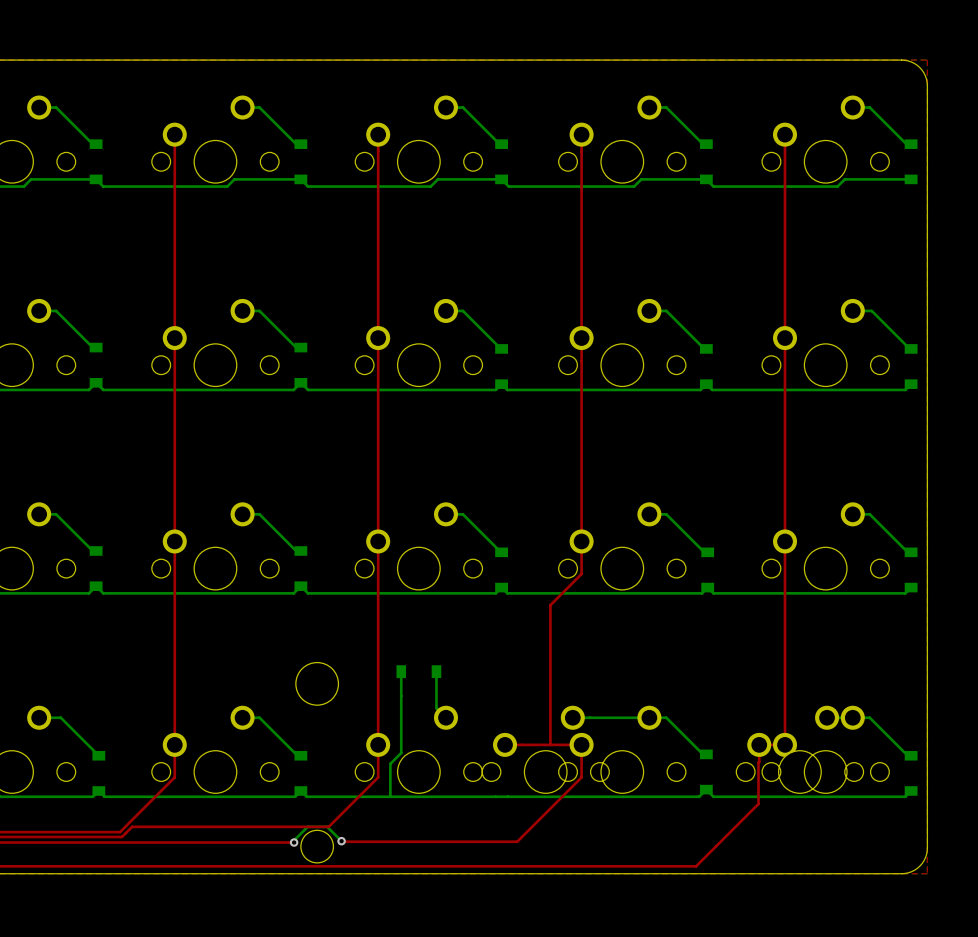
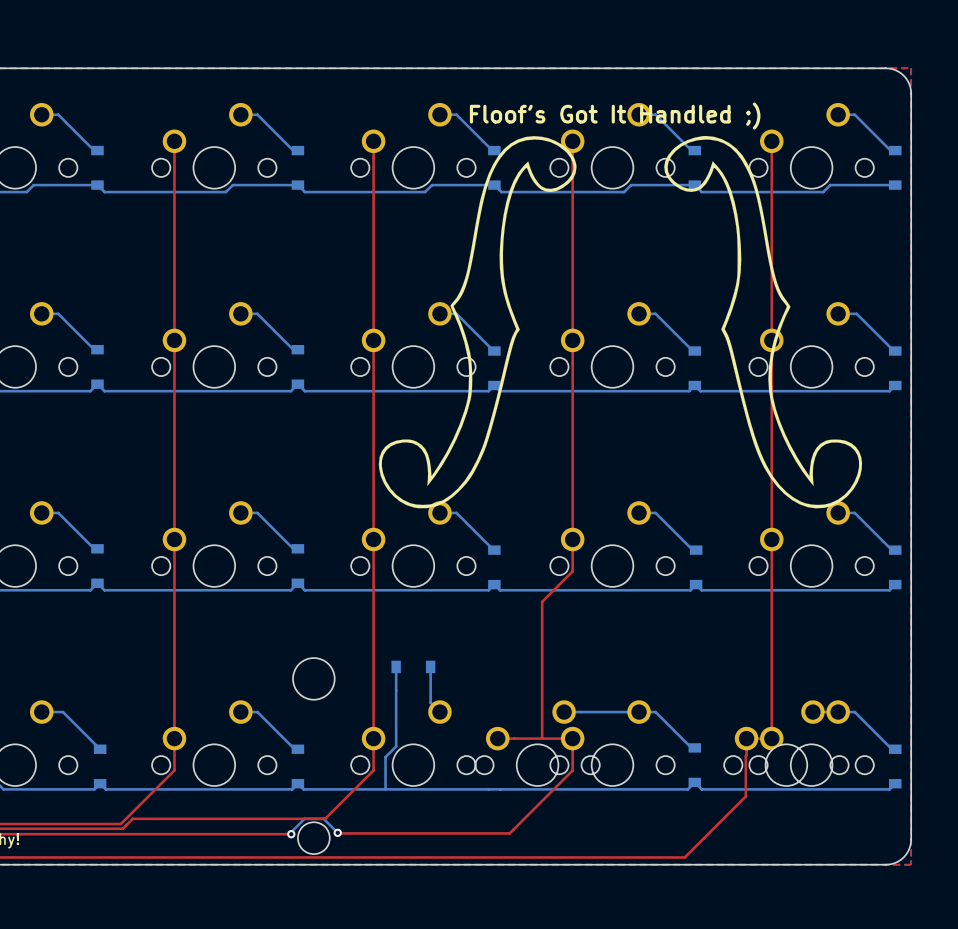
text: none -> Floof's Got It Handled ;) (615, 116)
drawing: none -> [378, 135, 863, 509]

